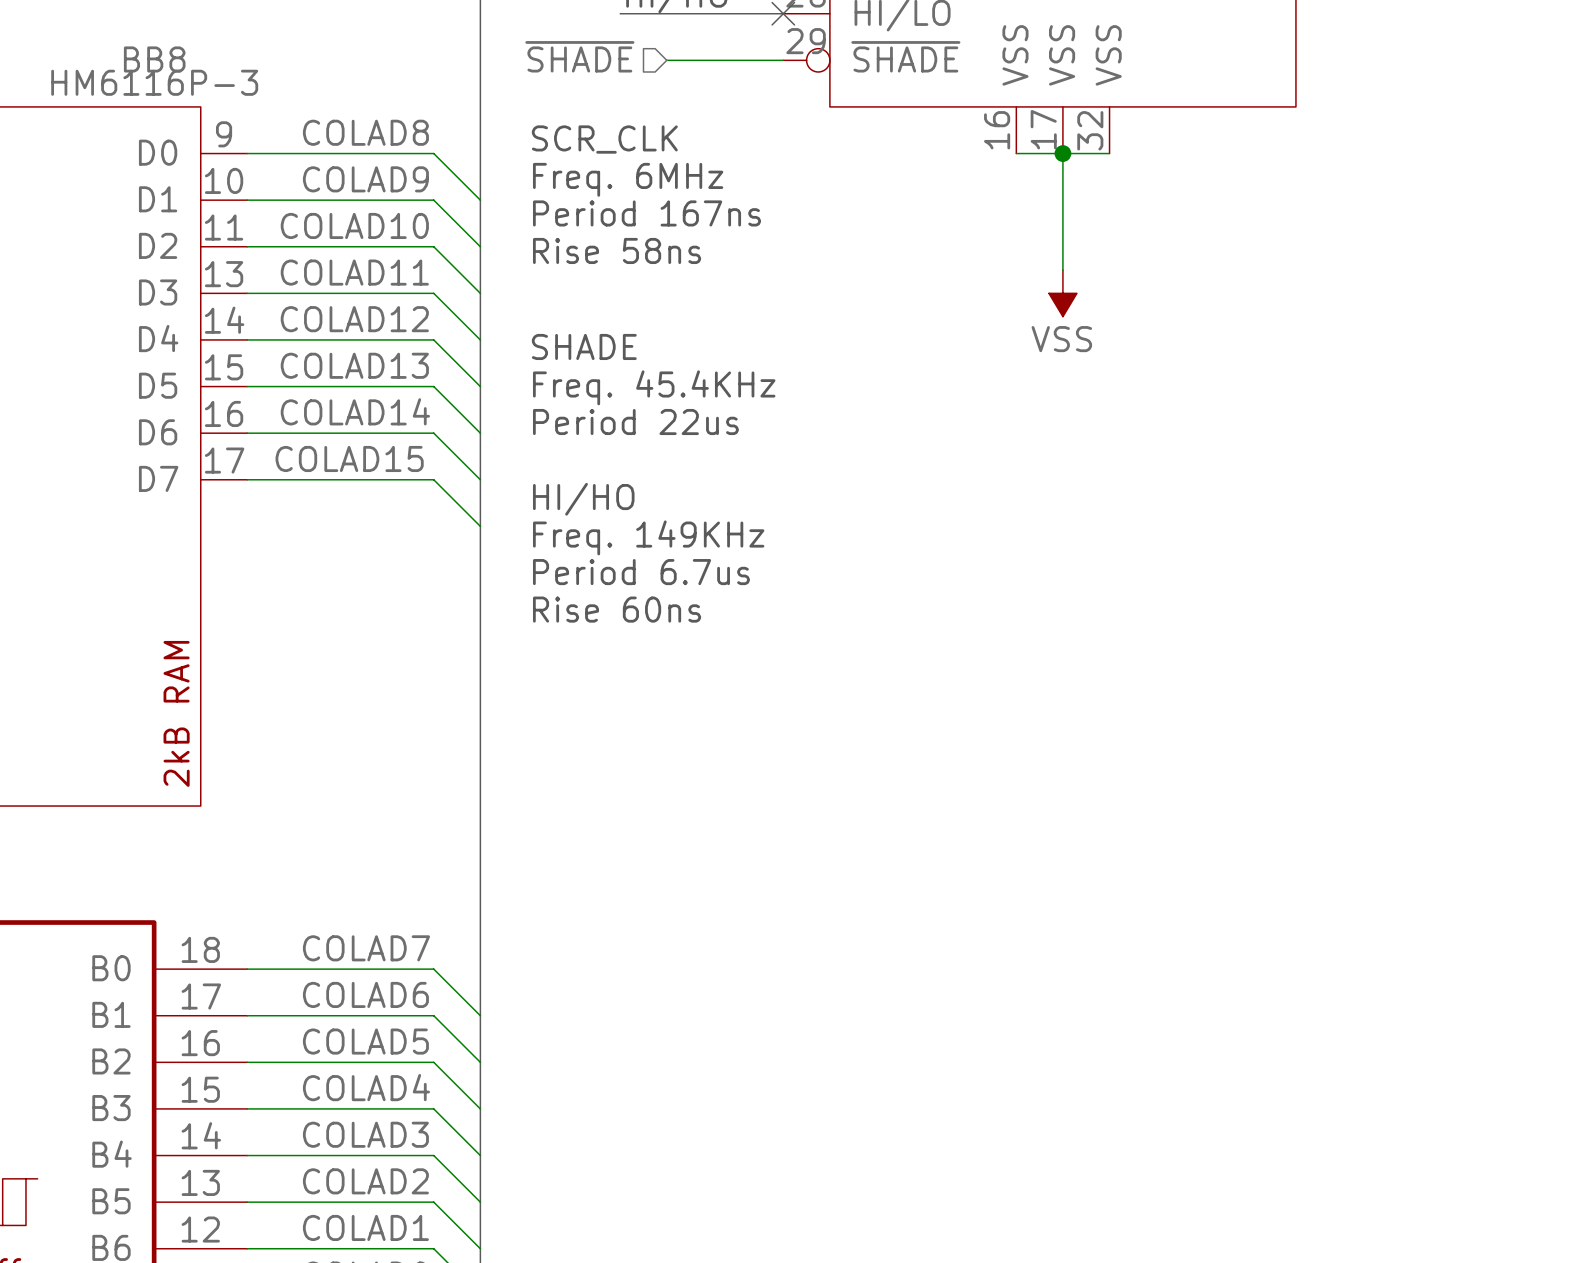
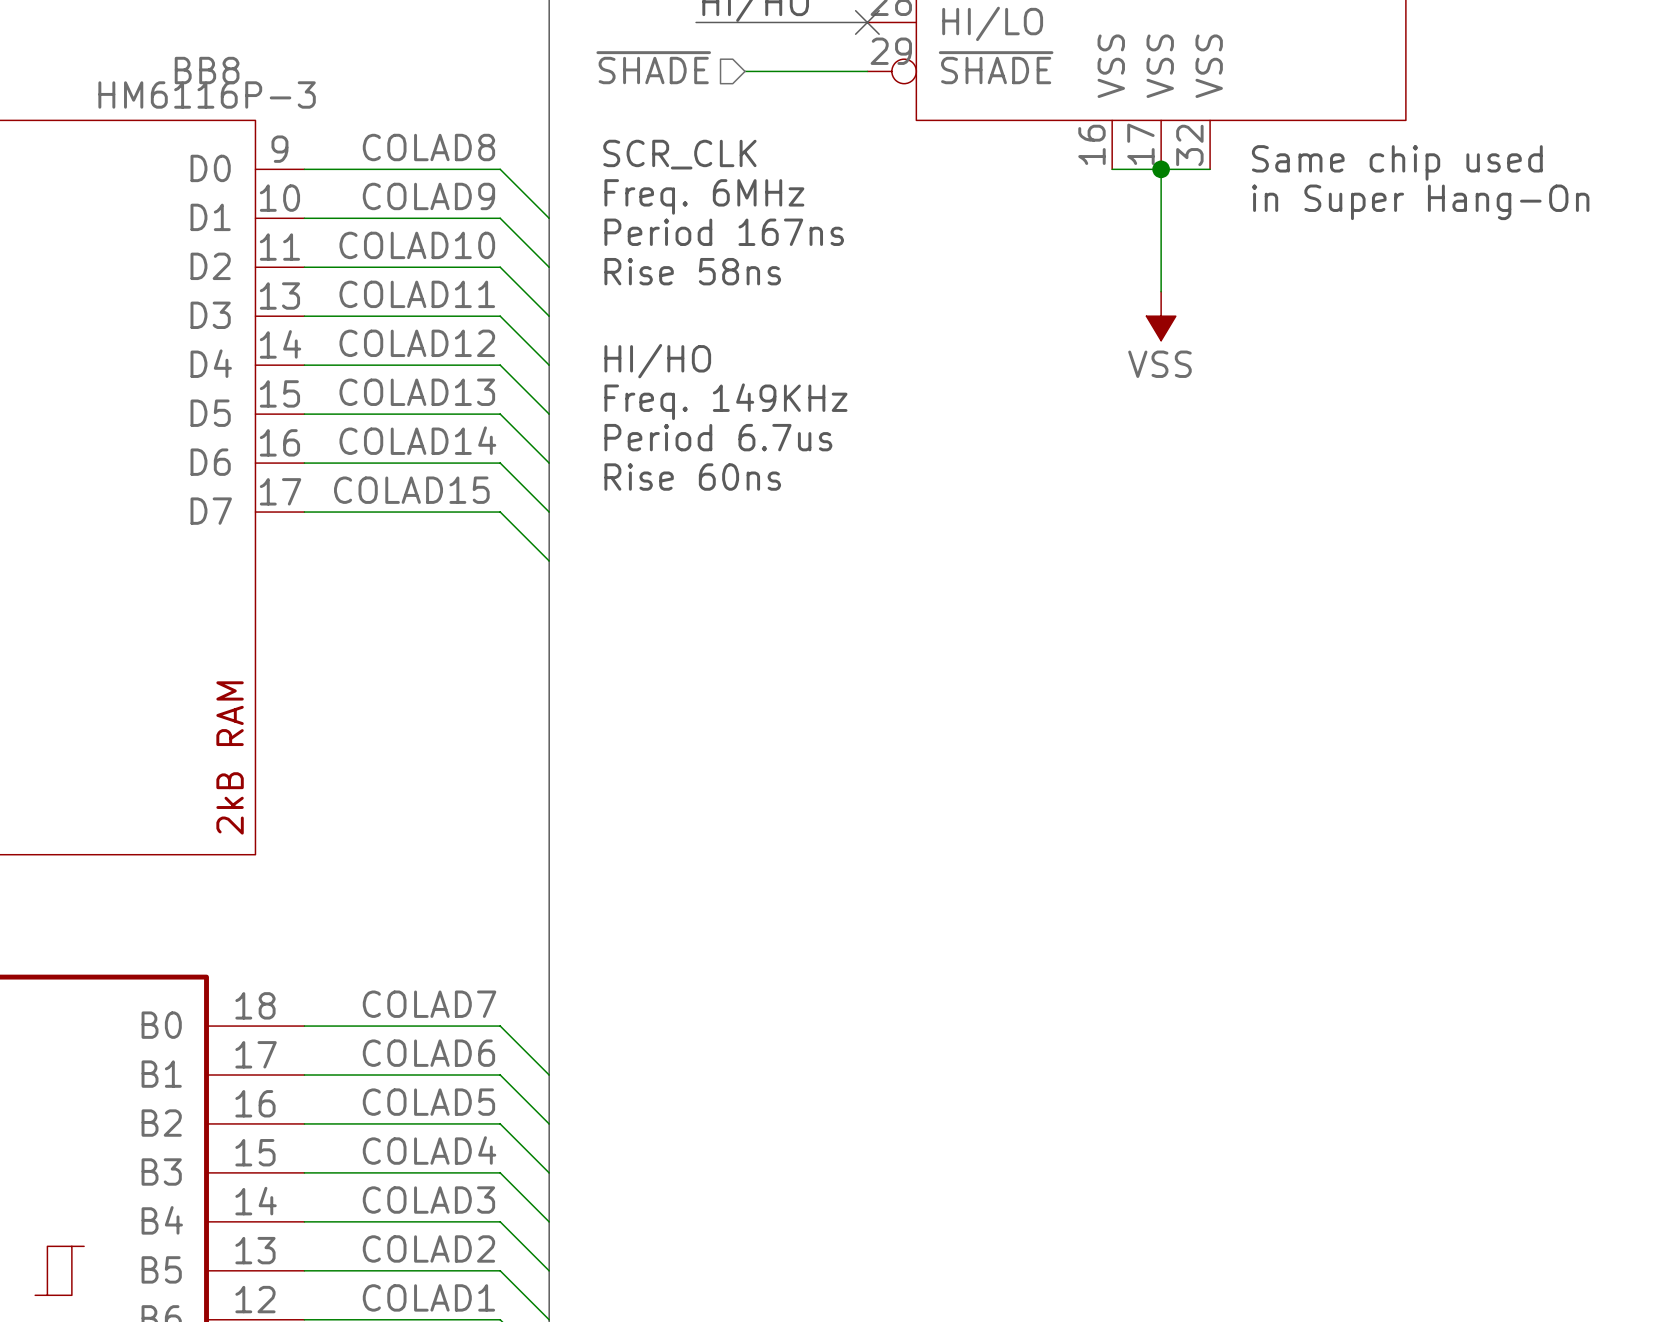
text: none -> Same chip used (1397, 162)
text: none -> in Super Hang-On (1420, 202)
text: SHADE (584, 346) -> none
text: Freq. 45.4KHz (654, 387) -> none
text: Period 22us (635, 422) -> none
text position: HI/HO (583, 499) -> HI/HO (657, 361)
text position: Freq. 149KHz (648, 537) -> Freq. 149KHz (725, 401)
text position: Period 6.7us (641, 572) -> Period 6.7us (718, 437)
text position: Rise 60ns (617, 609) -> Rise 60ns (692, 477)

